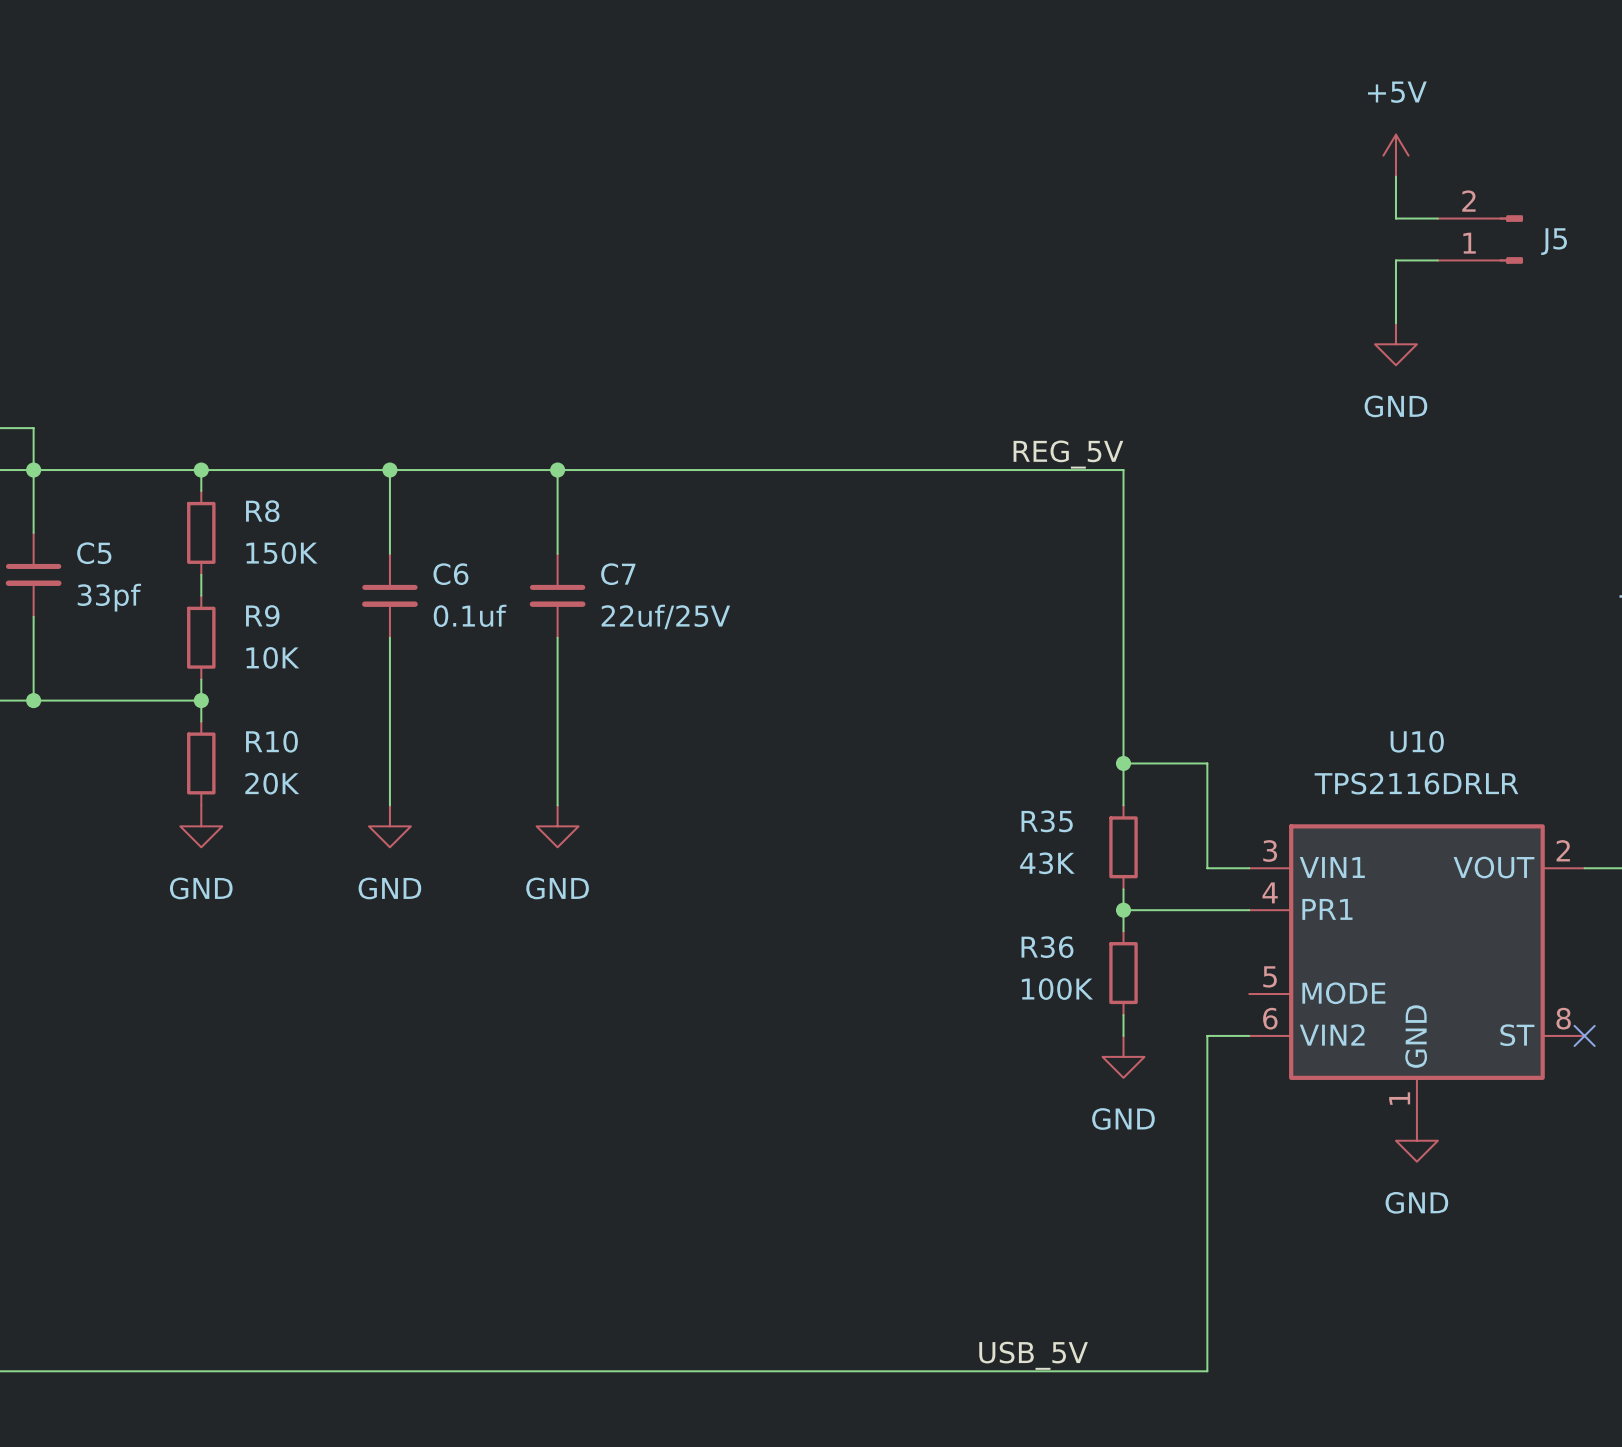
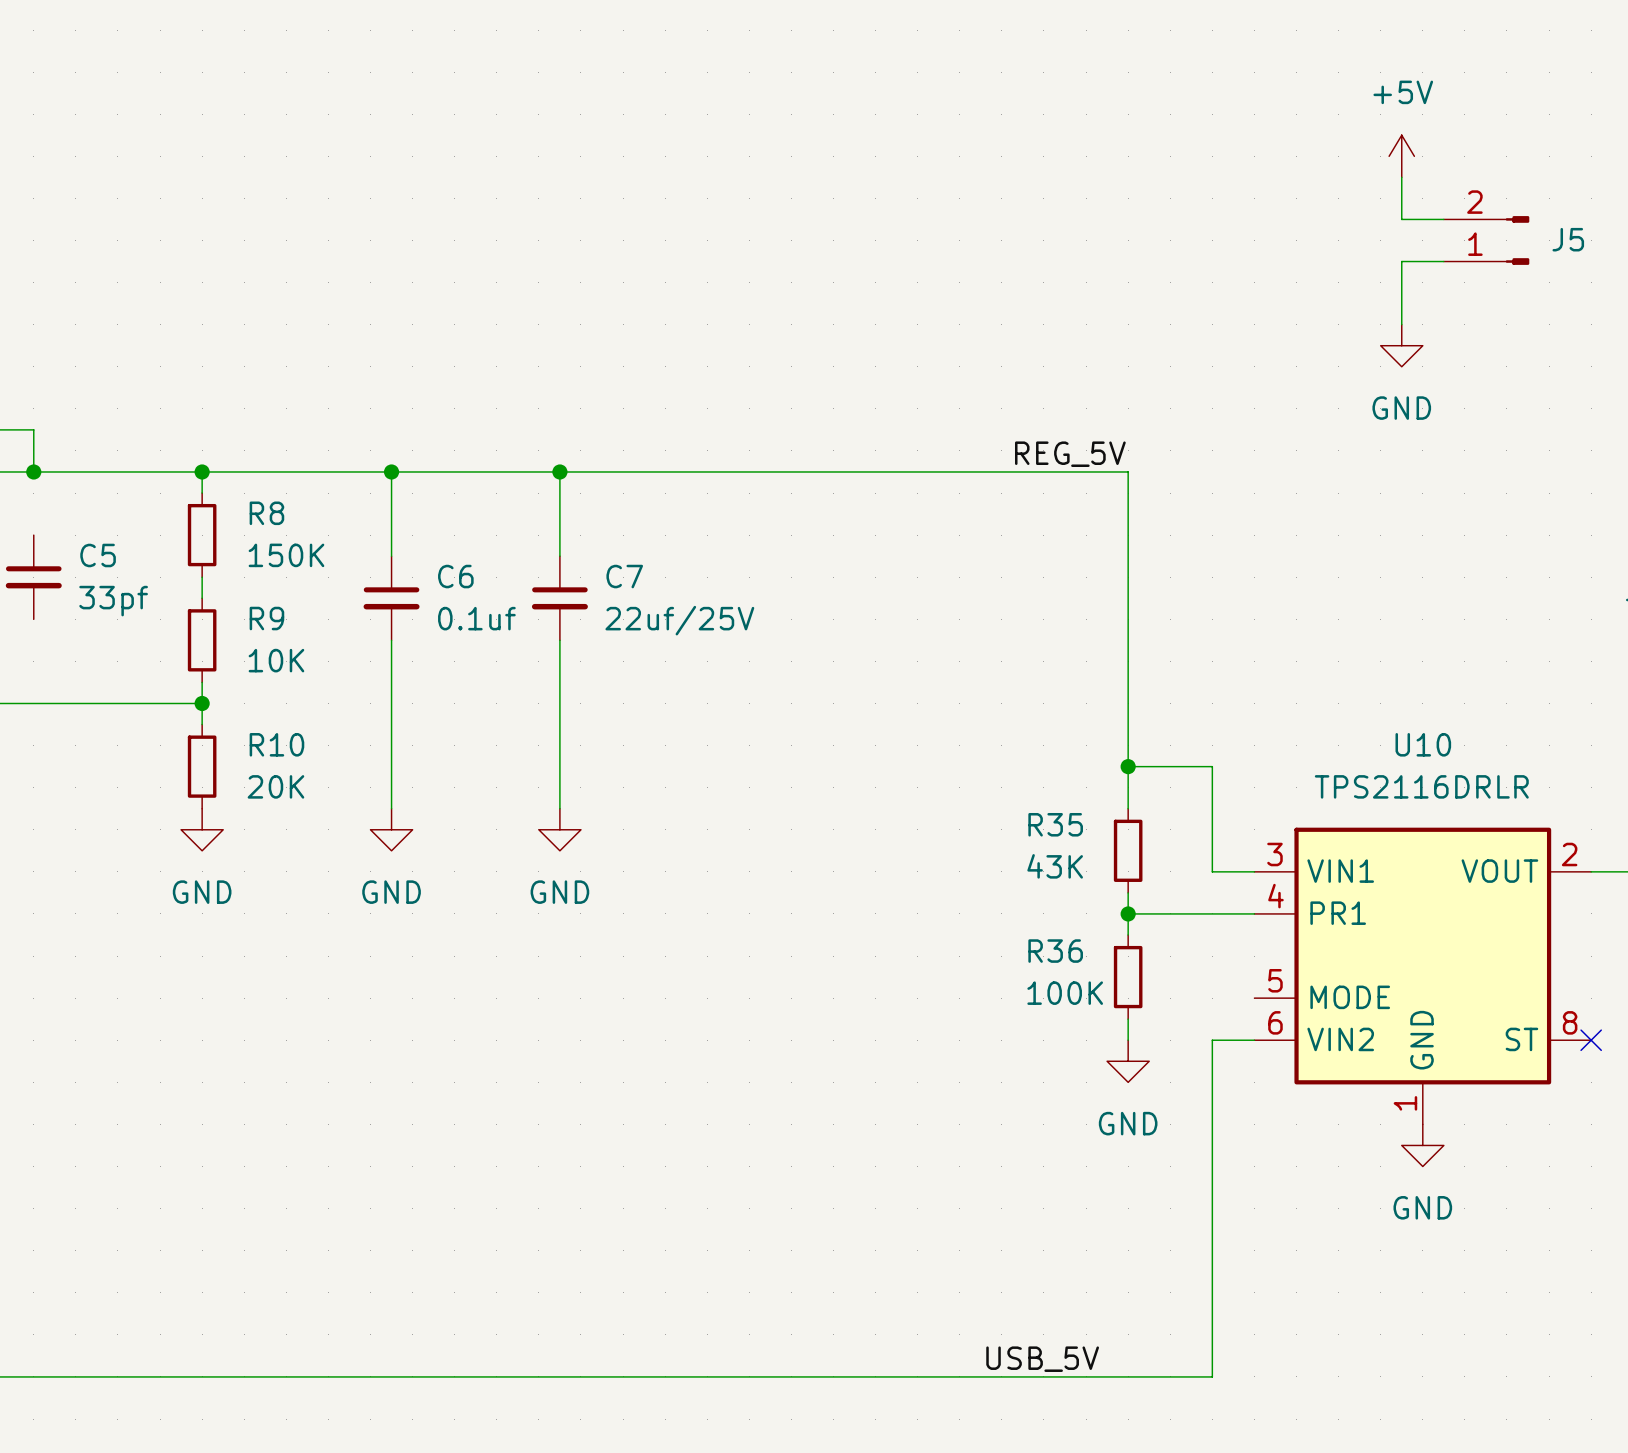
wire: (33, 470) (33, 532) -> none
wire: (33, 616) (33, 700) -> none
junction: (33, 700) -> none

